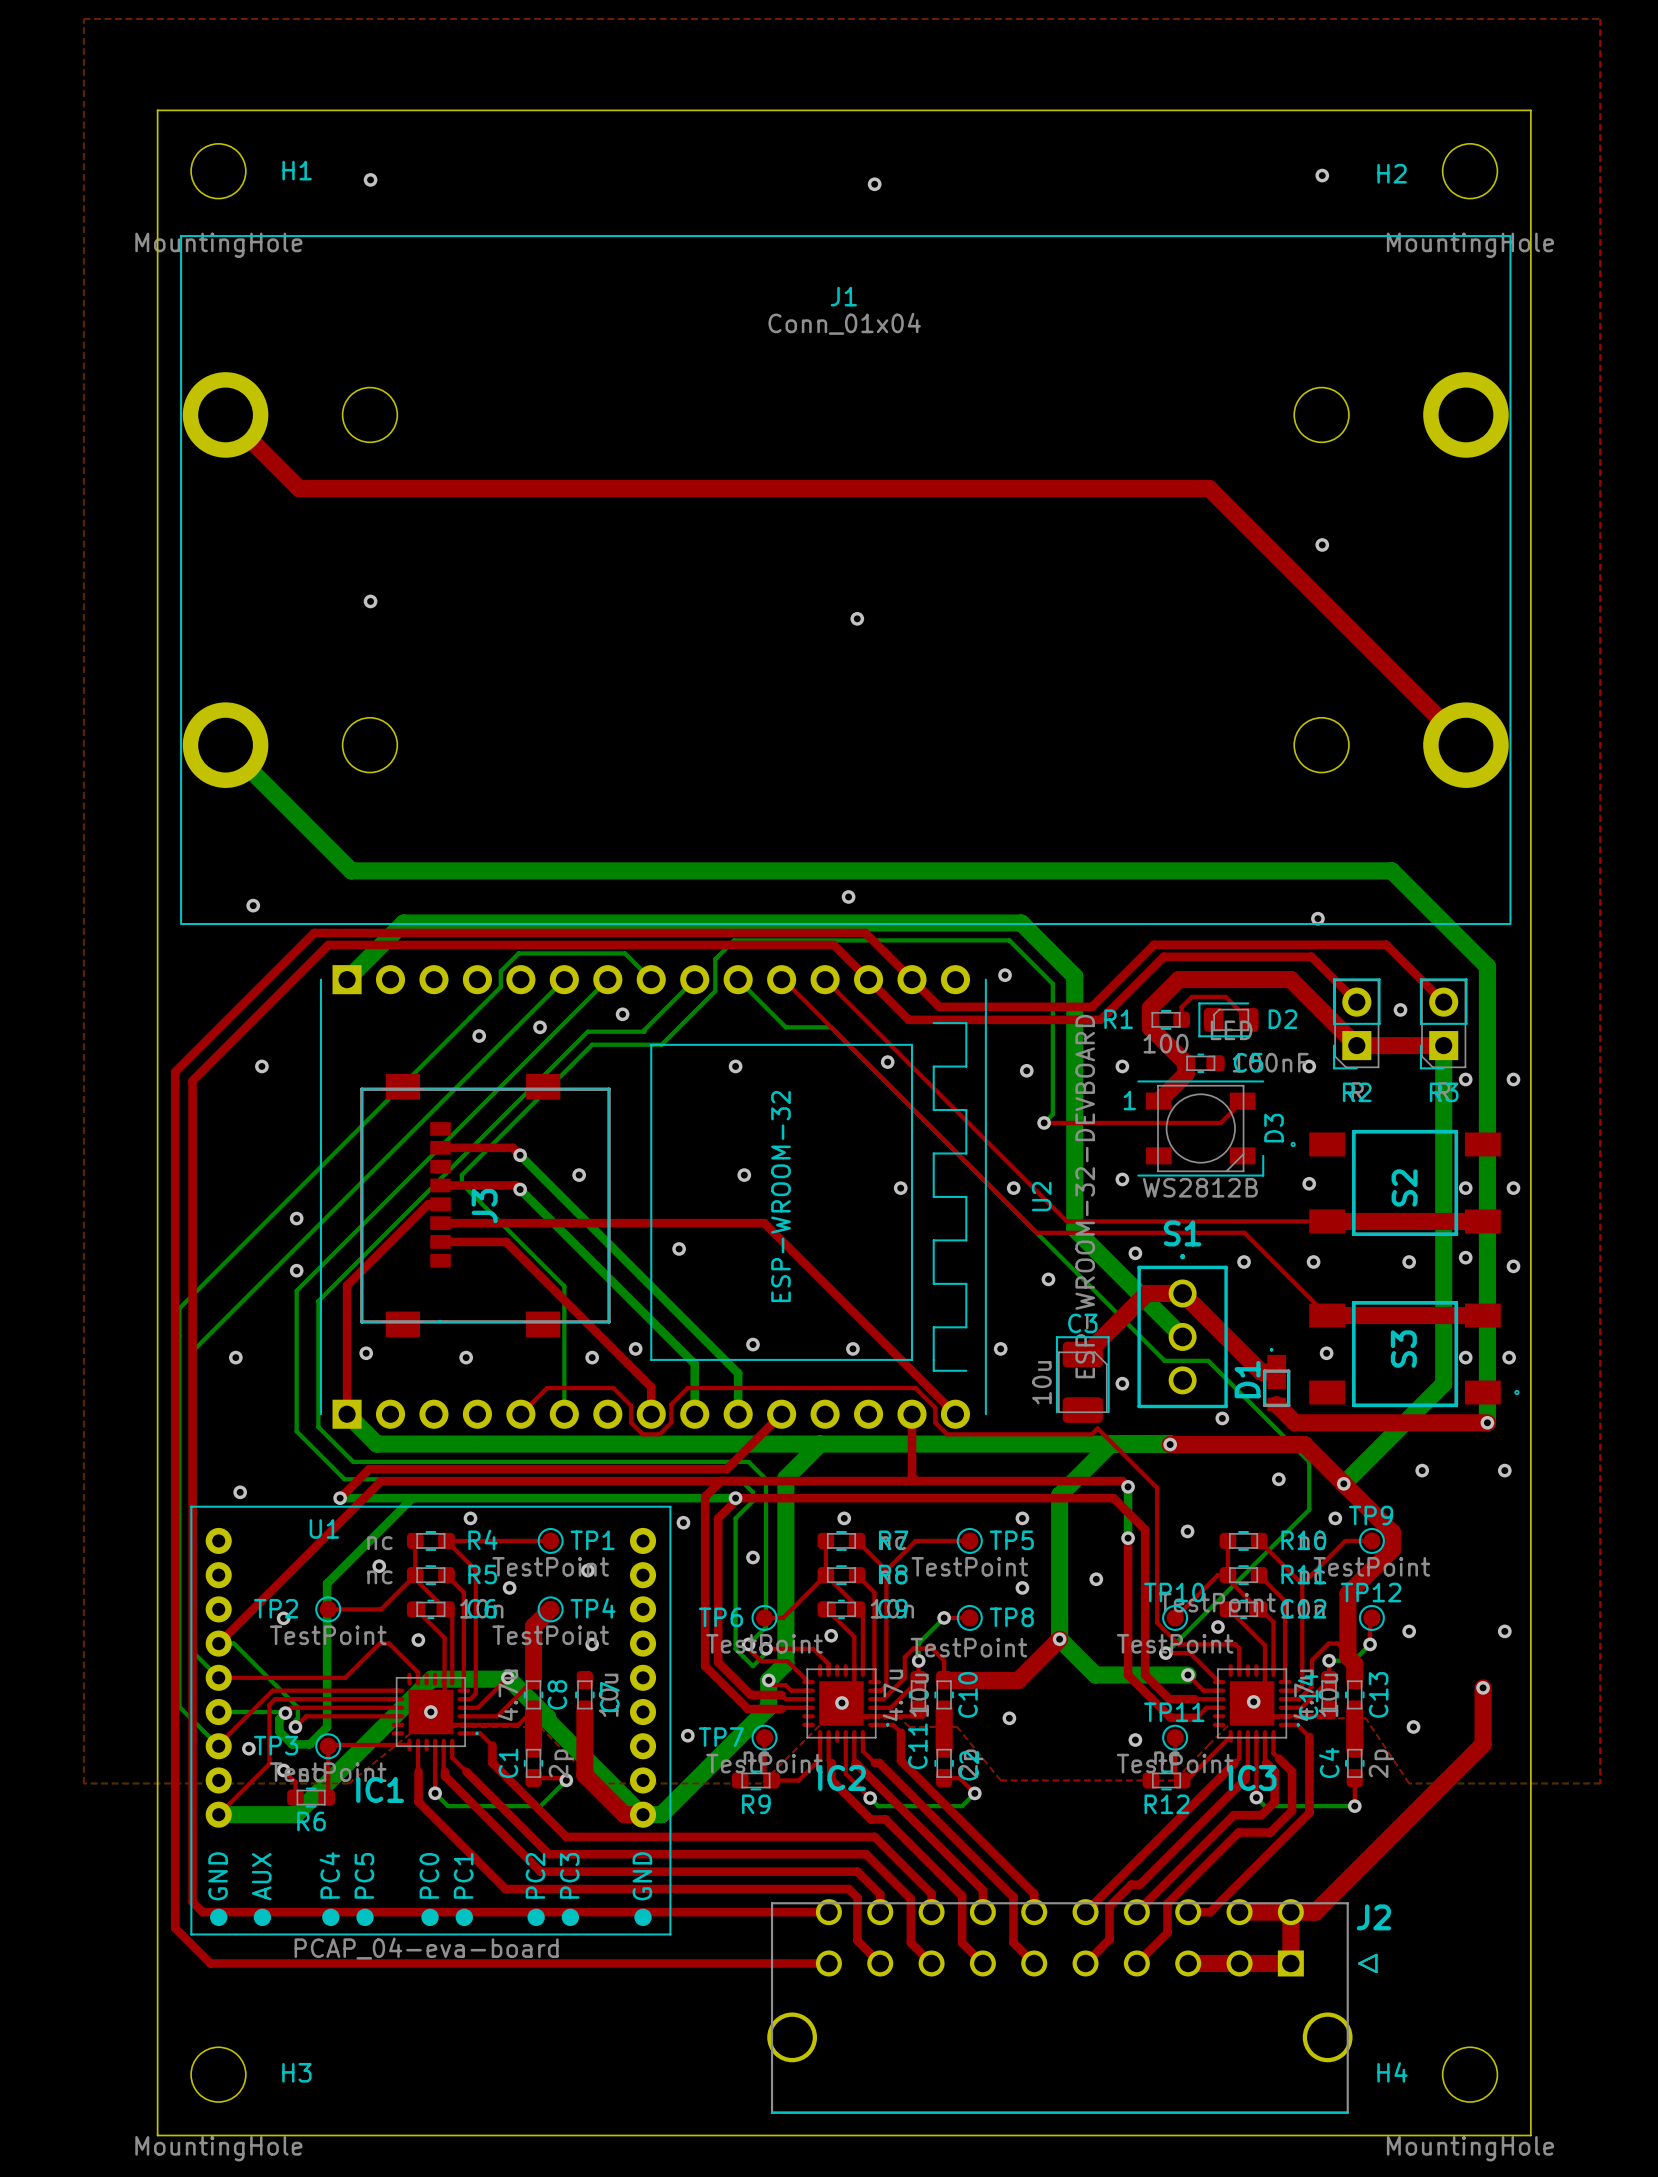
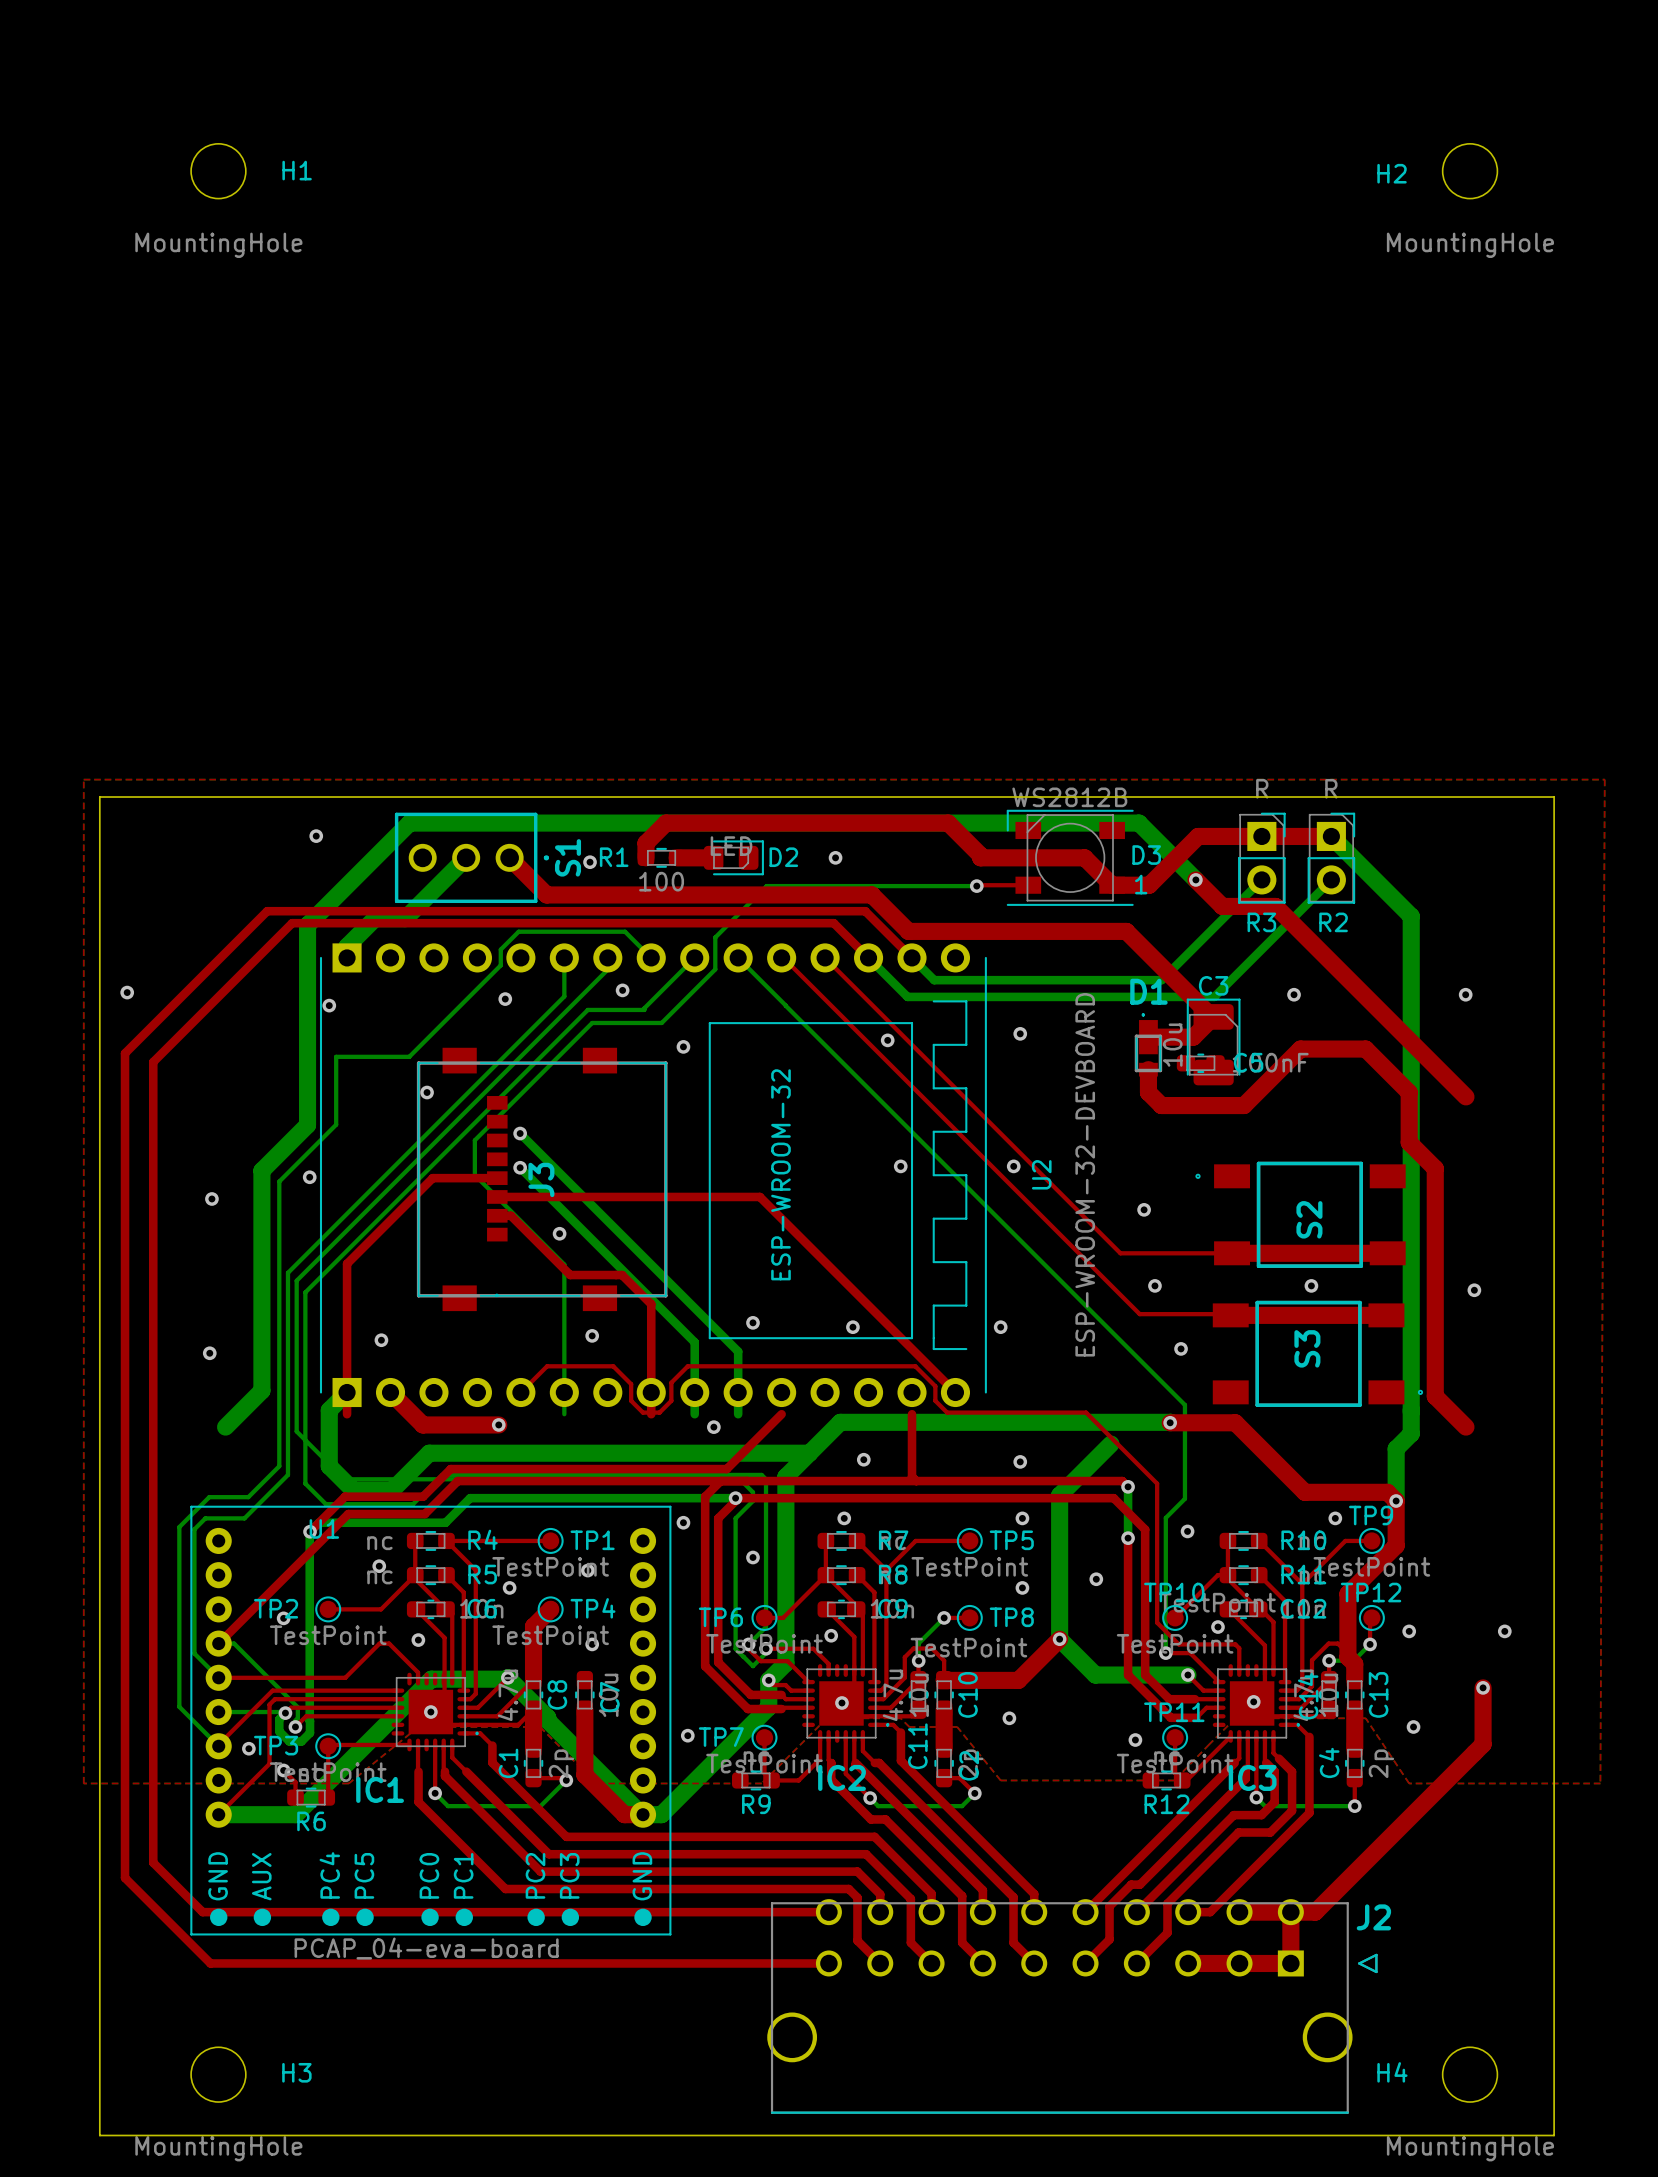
via: (1322, 175) -> none
via: (370, 179) -> none
via: (874, 184) -> none
top track: (225, 414) (299, 488) (1209, 488) (1465, 745) -> none
via: (1322, 544) -> none
J1: Conn_01x04 (845, 580) -> none
via: (370, 601) -> none
via: (857, 618) -> none
bottom track: (225, 745) (351, 870) (1391, 870) (1487, 966) (1487, 1422) -> none
top zone outline: (83, 779) (83, 19) (1600, 19) (1600, 1783) -> (83, 779) (1604, 779) (1600, 1783)
via: none -> (316, 836)
top track: none -> (1331, 836) (1198, 836) (1149, 885) (1112, 885) (1084, 857) (980, 857) (980, 855) (948, 823) (666, 823) (645, 843) (645, 857)
bottom track: none -> (1331, 836) (1411, 916) (1411, 1433) (1396, 1448) (1396, 1501)
bottom track: none -> (466, 857) (405, 918) (374, 918) (347, 946) (347, 957)
top track: none -> (509, 857) (546, 894) (872, 894) (908, 931) (1126, 931) (1213, 1016) (1193, 1037) (1148, 1037)
top track: none -> (677, 857) (713, 857)
via: none -> (590, 862)
top track: none -> (1195, 879) (1222, 906) (1275, 906) (1465, 1096)
bottom track: none -> (1195, 879) (1139, 823) (409, 823) (307, 925) (307, 1125) (261, 1170) (261, 1390) (225, 1427)
via: none -> (1195, 879)
bottom track: none -> (1261, 879) (1161, 980) (934, 980) (912, 957)
bottom track: none -> (1331, 879) (1214, 996) (907, 996) (868, 957)
top track: none -> (1028, 885) (976, 886)
via: none -> (976, 886)
via position: (848, 896) -> (835, 857)
via: (253, 905) -> none
via: (1317, 918) -> none
bottom track: none -> (738, 957) (785, 1005)
top track: none -> (781, 957) (1139, 1314) (1230, 1314)
top track: none -> (825, 957) (1120, 1253) (1387, 1253)
bottom track: (715, 959) (734, 940) (1009, 940) (1052, 983) (1052, 1114) (1044, 1122) -> (715, 959) (715, 937) (766, 886) (976, 886)
U2 footprint: [319, 965, 987, 1429] -> [319, 943, 987, 1408]
bottom track: (715, 969) (715, 991) (661, 1044) (592, 1044) (461, 1175) (461, 1183) (564, 1286) -> (715, 969) (661, 1022) (592, 1022) (474, 1140) (474, 1175) (564, 1264) (564, 1286)
via: (1005, 975) -> none
bottom track: (347, 979) (403, 923) (1021, 923) (1074, 976) (1074, 1229) (1182, 1336) -> none
bottom track: (564, 979) (194, 1349) (194, 1529) -> (564, 957) (564, 996) (287, 1272) (287, 1474) (244, 1518) (205, 1518) (194, 1529)
bottom track: (607, 979) (296, 1290) -> (607, 957) (607, 969) (296, 1280) (296, 1290)
bottom track: (651, 979) (625, 953) (518, 953) (500, 971) (500, 987) (179, 1308) (179, 1527) -> (651, 957) (625, 931) (518, 931) (500, 949) (500, 965) (409, 1056) (336, 1056) (336, 1124) (279, 1181) (279, 1466) (248, 1497) (209, 1497) (179, 1527)
bottom track: (694, 979) (644, 1031) (587, 1031) (318, 1301) (318, 1427) (353, 1461) (748, 1461) (761, 1474) -> (694, 957) (644, 1009) (587, 1009) (305, 1292) (305, 1483) (325, 1504) (413, 1504) (442, 1474) (761, 1474)
bottom track: (738, 979) (785, 1027) (831, 1027) (1164, 1360) (1208, 1360) (1309, 1461) (1309, 1509) (1165, 1653) -> (785, 1005) (1184, 1404) (1184, 1498) (1165, 1517) (1165, 1653)
top track: (781, 979) (1036, 1232) (1244, 1232) (1327, 1315) (1482, 1315) -> none
top track: (825, 979) (1066, 1221) (1482, 1221) -> none
via: none -> (127, 992)
via: none -> (1294, 994)
via: none -> (1465, 994)
via: none -> (505, 999)
top track: (1356, 1002) (1311, 956) (1163, 956) (1100, 1019) (908, 1019) (833, 944) (328, 944) (192, 1080) (192, 1902) -> (868, 957) (833, 923) (292, 923) (153, 1062) (153, 1862) (192, 1902)
top track: (1443, 1002) (1386, 944) (1154, 944) (1092, 1006) (939, 1006) (865, 932) (314, 932) (175, 1072) (175, 1928) -> (912, 957) (865, 911) (267, 911) (125, 1053) (125, 1877) (175, 1928)
via: none -> (329, 1005)
via: (1400, 1009) -> none
via position: (622, 1014) -> (622, 990)
R1 position: (1166, 1019) -> (661, 857)
top track: (1181, 1019) (1181, 1007) (1191, 996) (1225, 996) (1248, 1019) -> none
D2 rotation: 0° (1228, 1019) -> 180° (733, 857)
D2 position: (1228, 1019) -> (733, 857)
R2 rotation: 0° (1356, 1023) -> 180° (1331, 858)
R2 position: (1356, 1023) -> (1331, 858)
R3 rotation: 0° (1443, 1023) -> 180° (1261, 858)
R3 position: (1443, 1023) -> (1261, 858)
via: (540, 1027) -> none
via: none -> (1020, 1033)
via: (479, 1036) -> none
top track: (1443, 1045) (1356, 1045) (1290, 979) (1178, 979) (1150, 1007) (1150, 1027) (1186, 1063) (1186, 1073) (1158, 1101) -> none
bottom track: (1443, 1045) (1443, 1383) (1343, 1483) -> none
via: none -> (683, 1046)
via position: (887, 1062) -> (887, 1040)
via: (261, 1066) -> none
via: (735, 1066) -> none
via: (1122, 1066) -> none
via: (1309, 1066) -> none
top track: none -> (1148, 1069) (1148, 1092) (1161, 1105) (1244, 1105) (1300, 1049) (1365, 1049) (1409, 1092) (1409, 1142) (1435, 1168) (1435, 1396) (1465, 1427)
via: (1026, 1070) -> none
via: (1465, 1079) -> none
via: (1513, 1079) -> none
via: none -> (427, 1092)
top track: (1242, 1101) (1220, 1122) (1044, 1122) -> none
via: (1044, 1122) -> none
D3 rotation: 0° (1200, 1128) -> 180° (1070, 857)
D3 position: (1200, 1128) -> (1070, 857)
via: none -> (520, 1133)
top track: (440, 1147) (512, 1147) (520, 1155) -> none
bottom track: (520, 1155) (738, 1373) -> (520, 1133) (738, 1351) (738, 1373)
via position: (520, 1155) -> (520, 1167)
via: (579, 1175) -> none
via: (744, 1175) -> none
via: (1122, 1179) -> none
S2 position: (1395, 1182) -> (1300, 1214)
via: (1309, 1183) -> none
top track: (440, 1185) (516, 1185) (520, 1189) -> none
via position: (900, 1188) -> (900, 1166)
via position: (1013, 1188) -> (1013, 1166)
via: (1465, 1188) -> none
via: (1513, 1188) -> none
bottom track: (520, 1189) (694, 1364) -> (520, 1167) (694, 1342) (694, 1364)
via: (520, 1189) -> none
top track: none -> (497, 1196) (759, 1196) (955, 1392)
via: none -> (211, 1198)
top track: (440, 1204) (428, 1204) (347, 1285) -> (497, 1178) (432, 1178) (347, 1263) (347, 1285)
J3 position: (485, 1205) -> (542, 1179)
via: none -> (1144, 1209)
via position: (296, 1218) -> (309, 1177)
top track: (440, 1223) (764, 1223) (955, 1414) -> none
via: none -> (559, 1233)
top track: (440, 1241) (506, 1241) (651, 1387) -> (497, 1215) (510, 1215) (570, 1275) (622, 1275) (651, 1304) (651, 1387)
via: (679, 1248) -> none
via: (1135, 1253) -> none
via: (1465, 1257) -> none
via: (1244, 1262) -> none
via position: (1313, 1262) -> (1311, 1285)
via: (1409, 1262) -> none
via: (1513, 1266) -> none
via: (296, 1270) -> none
via: (1048, 1279) -> none
via: none -> (1154, 1285)
via: none -> (1474, 1290)
top track: none -> (1230, 1315) (1386, 1315)
S1 rotation: 0° (1182, 1331) -> 90° clockwise (471, 857)
S1 position: (1182, 1331) -> (471, 857)
via position: (752, 1344) -> (752, 1322)
via: (635, 1348) -> none
via position: (852, 1348) -> (852, 1327)
via position: (1000, 1348) -> (1000, 1327)
via: none -> (1181, 1348)
top track: (1088, 1351) (1146, 1293) (1182, 1293) (1261, 1372) (1276, 1372) -> none
via position: (366, 1353) -> (381, 1340)
via: (1326, 1353) -> none
S3 position: (1414, 1354) -> (1317, 1353)
via position: (235, 1357) -> (209, 1353)
via: (466, 1357) -> none
via position: (592, 1357) -> (592, 1335)
via: (1465, 1357) -> none
via: (1509, 1357) -> none
C3 position: (1082, 1379) -> (1213, 1041)
D1 name rotation: 0° (1247, 1379) -> 90° clockwise (1148, 991)
D1 name position: D1 (1247, 1379) -> D1 (1148, 991)
D1 position: (1276, 1379) -> (1148, 1044)
via: (1122, 1383) -> none
bottom track: none -> (347, 1392) (329, 1410) (329, 1466) (353, 1490) (392, 1490) (429, 1453) (809, 1453)
top track: none -> (390, 1392) (422, 1424) (498, 1424)
top track: (1276, 1404) (1294, 1422) (1487, 1422) -> none
bottom track: (347, 1414) (376, 1444) (1170, 1444) -> none
top track: (520, 1414) (547, 1388) (613, 1388) (631, 1405) (631, 1422) (642, 1434) (659, 1434) (671, 1422) (671, 1404) (687, 1388) (915, 1388) (935, 1408) (935, 1422) (947, 1434) (1091, 1434) (1097, 1428) (1157, 1487) -> (520, 1392) (547, 1366) (613, 1366) (631, 1384) (631, 1400) (642, 1412) (659, 1412) (671, 1400) (671, 1382) (687, 1366) (915, 1366) (935, 1386) (935, 1400) (947, 1412) (1086, 1412) (1157, 1483) (1157, 1487)
via: (1222, 1418) -> none
via: (1487, 1422) -> none
via: none -> (498, 1424)
via: none -> (713, 1427)
bottom track: (820, 1444) (785, 1478) -> (1170, 1422) (840, 1422) (785, 1478)
top track: (1170, 1444) (1304, 1444) (1392, 1532) (1392, 1549) -> (1170, 1422) (1235, 1422) (1304, 1492) (1387, 1492) (1396, 1501) (1396, 1545) (1392, 1549)
via position: (1170, 1444) -> (1170, 1422)
via: none -> (863, 1459)
via: none -> (1020, 1461)
top track: (450, 1469) (369, 1469) (340, 1498) -> (450, 1469) (423, 1496) (345, 1496) (310, 1531)
via: (1422, 1470) -> none
via: (1504, 1470) -> none
via: (1278, 1479) -> none
top track: (457, 1481) (381, 1481) (348, 1514) -> (457, 1481) (424, 1514) (348, 1514)
via: (1343, 1483) -> none
via: (240, 1492) -> none
bottom track: (340, 1498) (470, 1498) -> none
via: (340, 1498) -> none
bottom track: (412, 1498) (327, 1583) (327, 1726) (309, 1744) (292, 1744) (289, 1741) -> (470, 1498) (445, 1522) (319, 1522) (309, 1532) (309, 1732) (301, 1741) (289, 1741)
via: none -> (1396, 1501)
via: (470, 1518) -> none
via: none -> (310, 1531)
board edge: (157, 2135) (157, 110) (1530, 110) (1530, 2135) -> (157, 2135) (99, 2135) (99, 797) (1554, 797) (1554, 2135) (1530, 2135)

